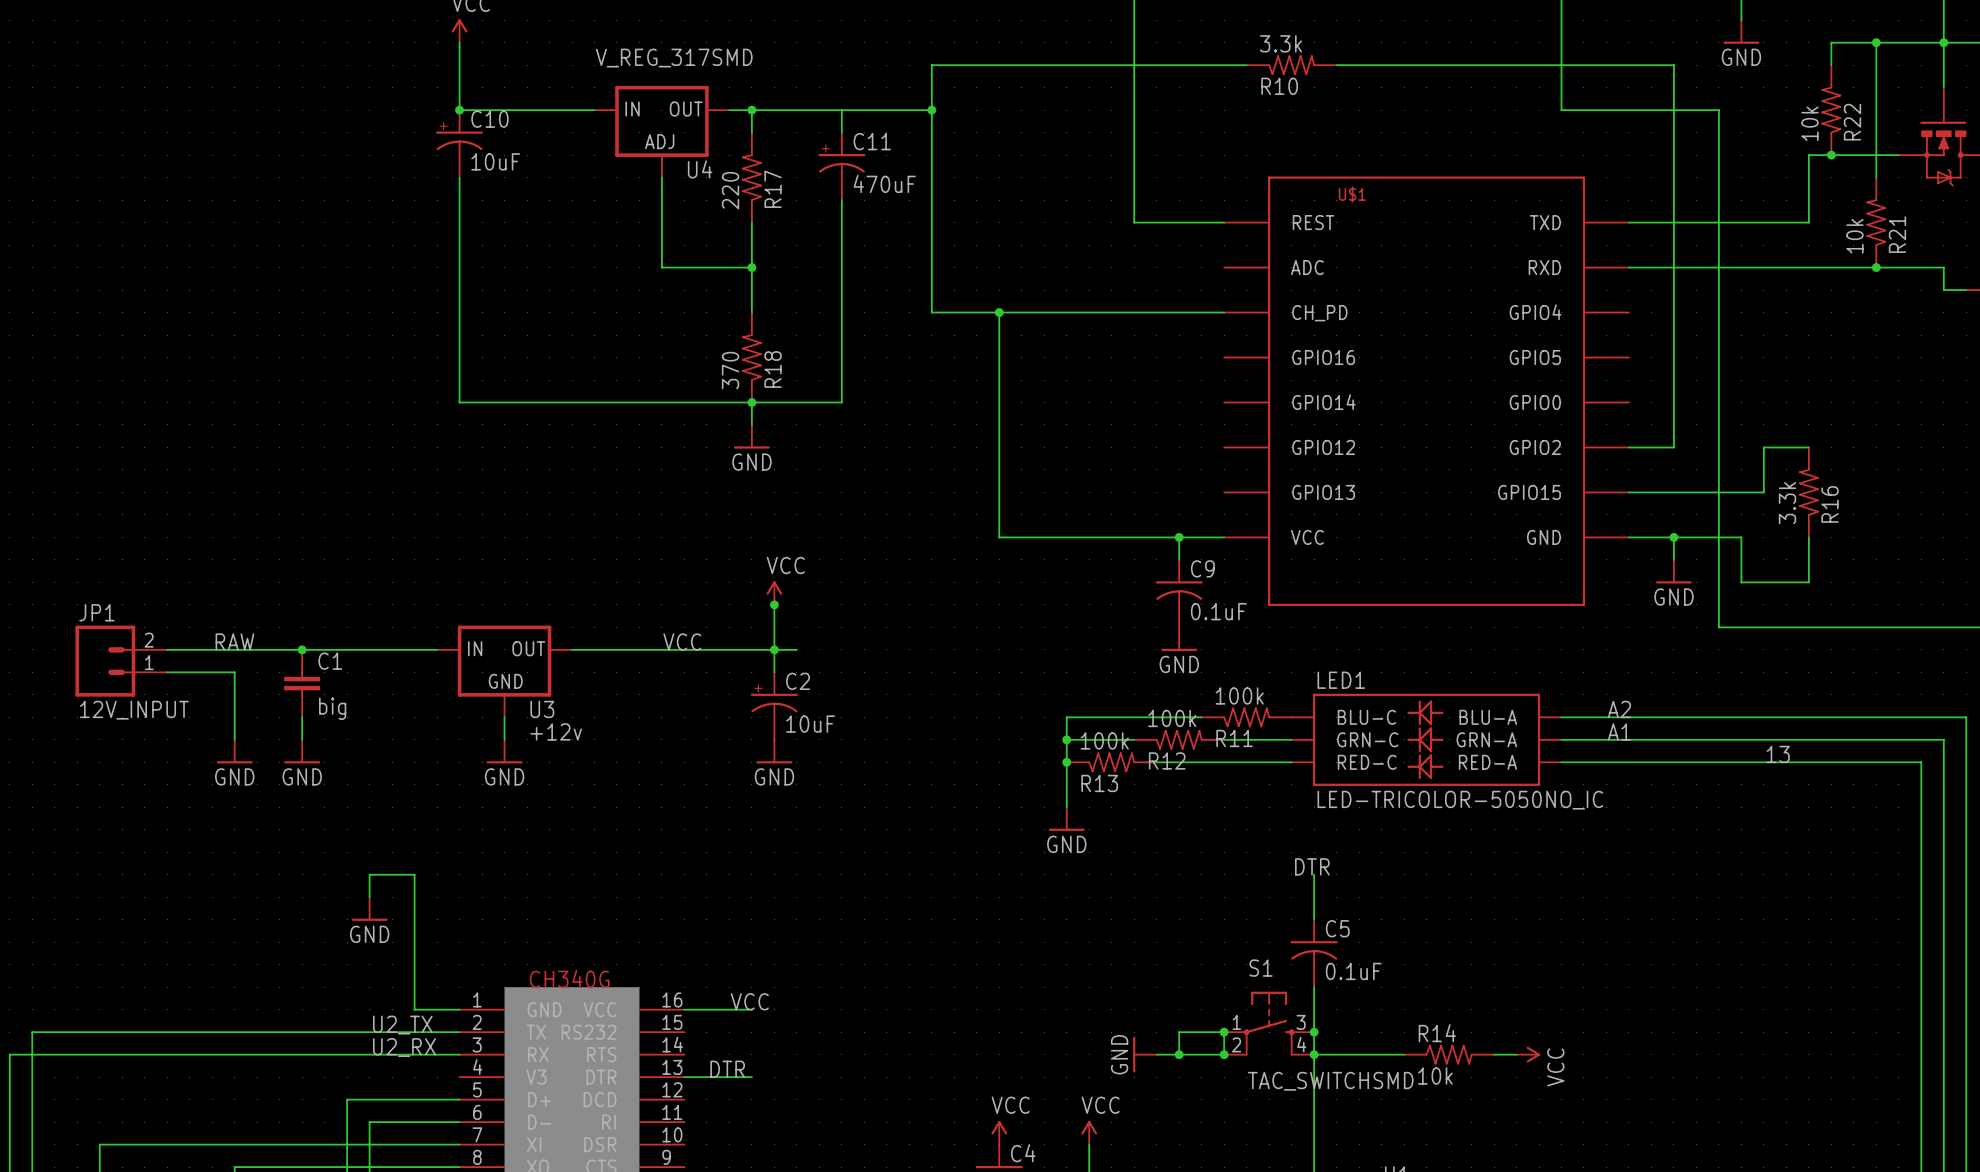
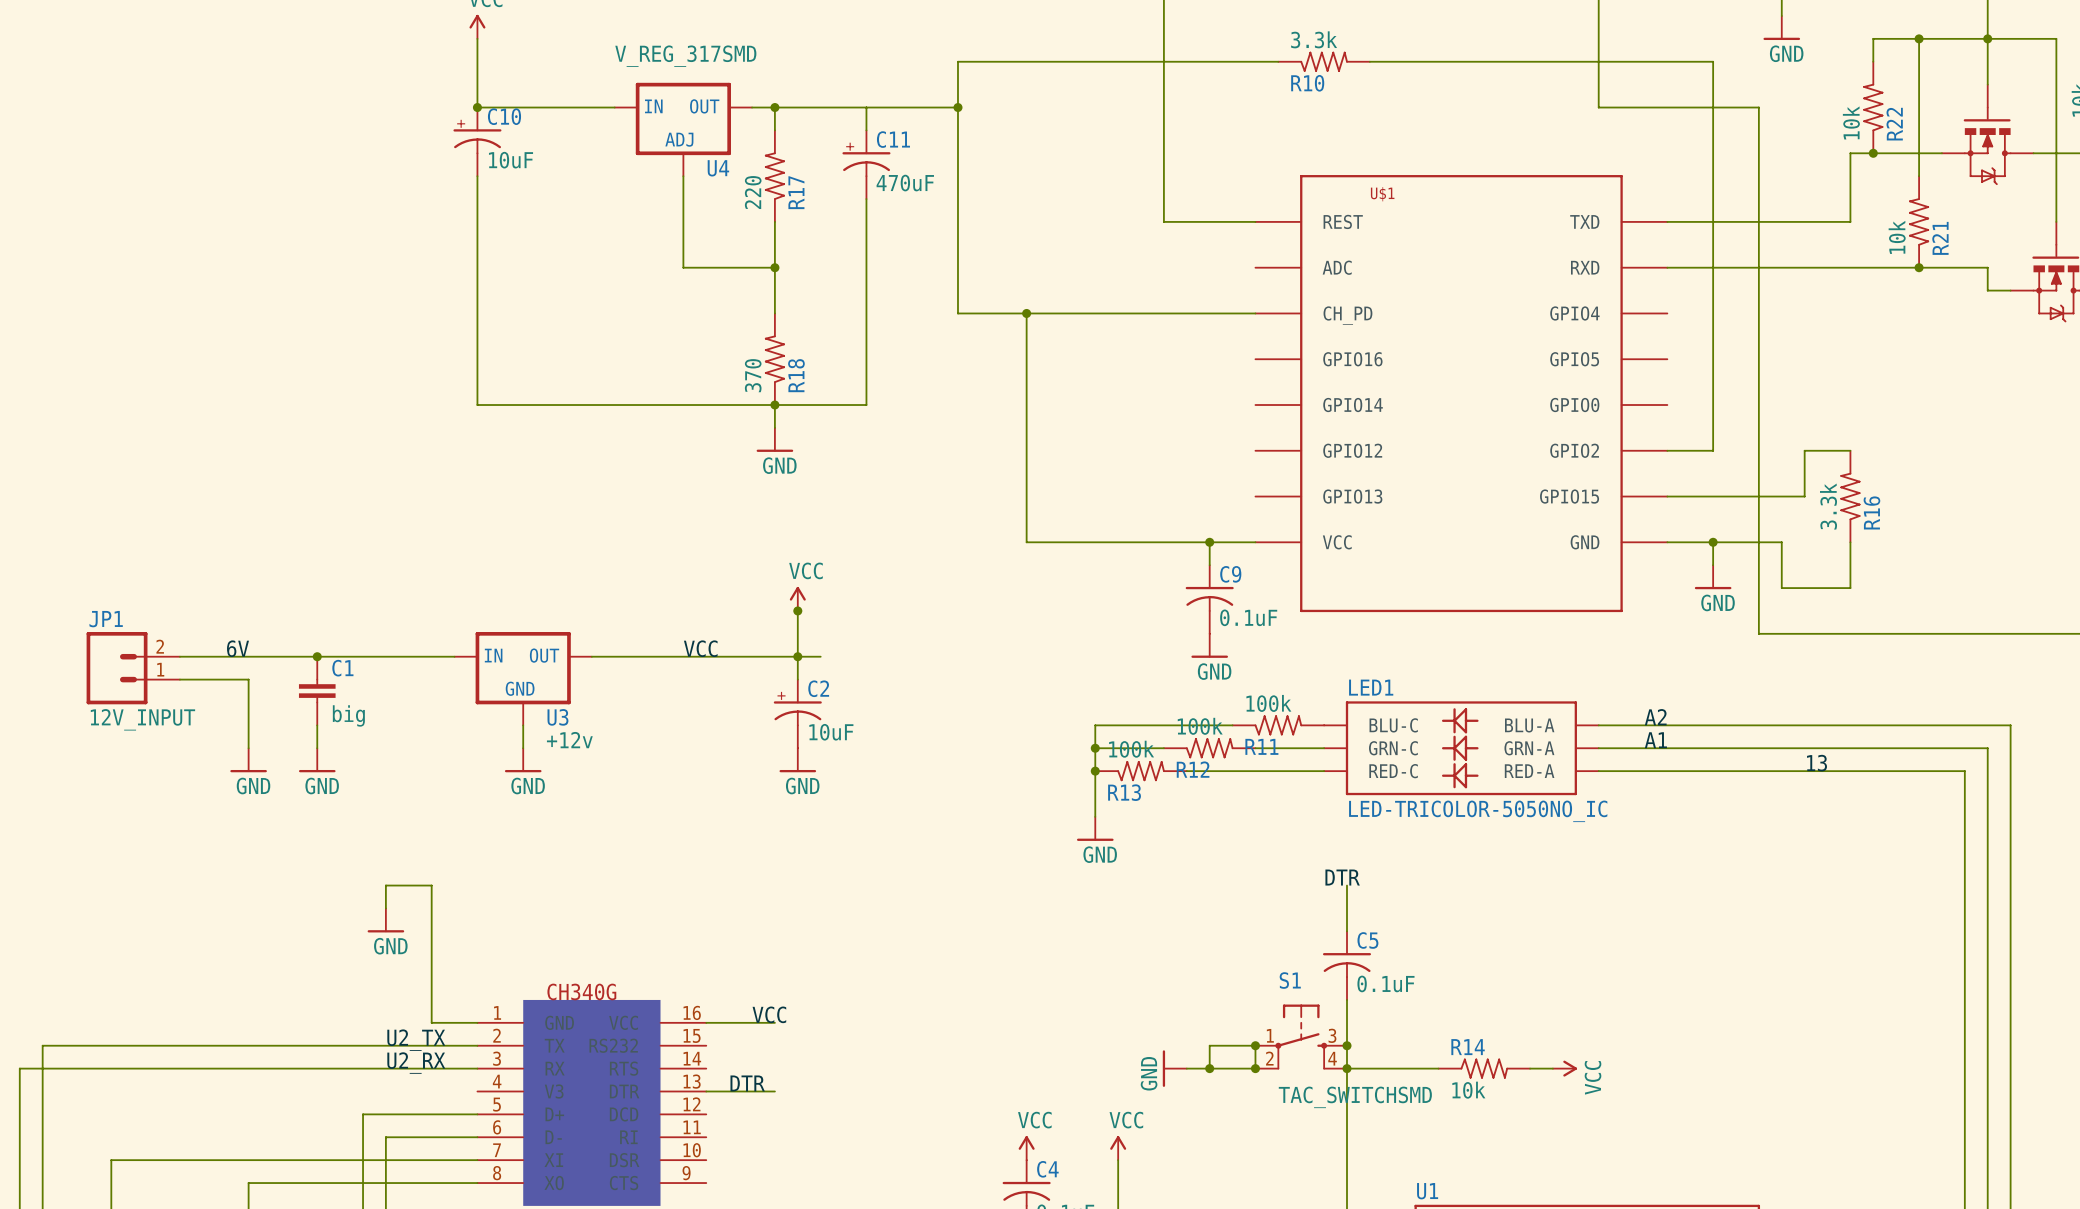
label: RAW (234, 642) -> 6V (238, 648)

